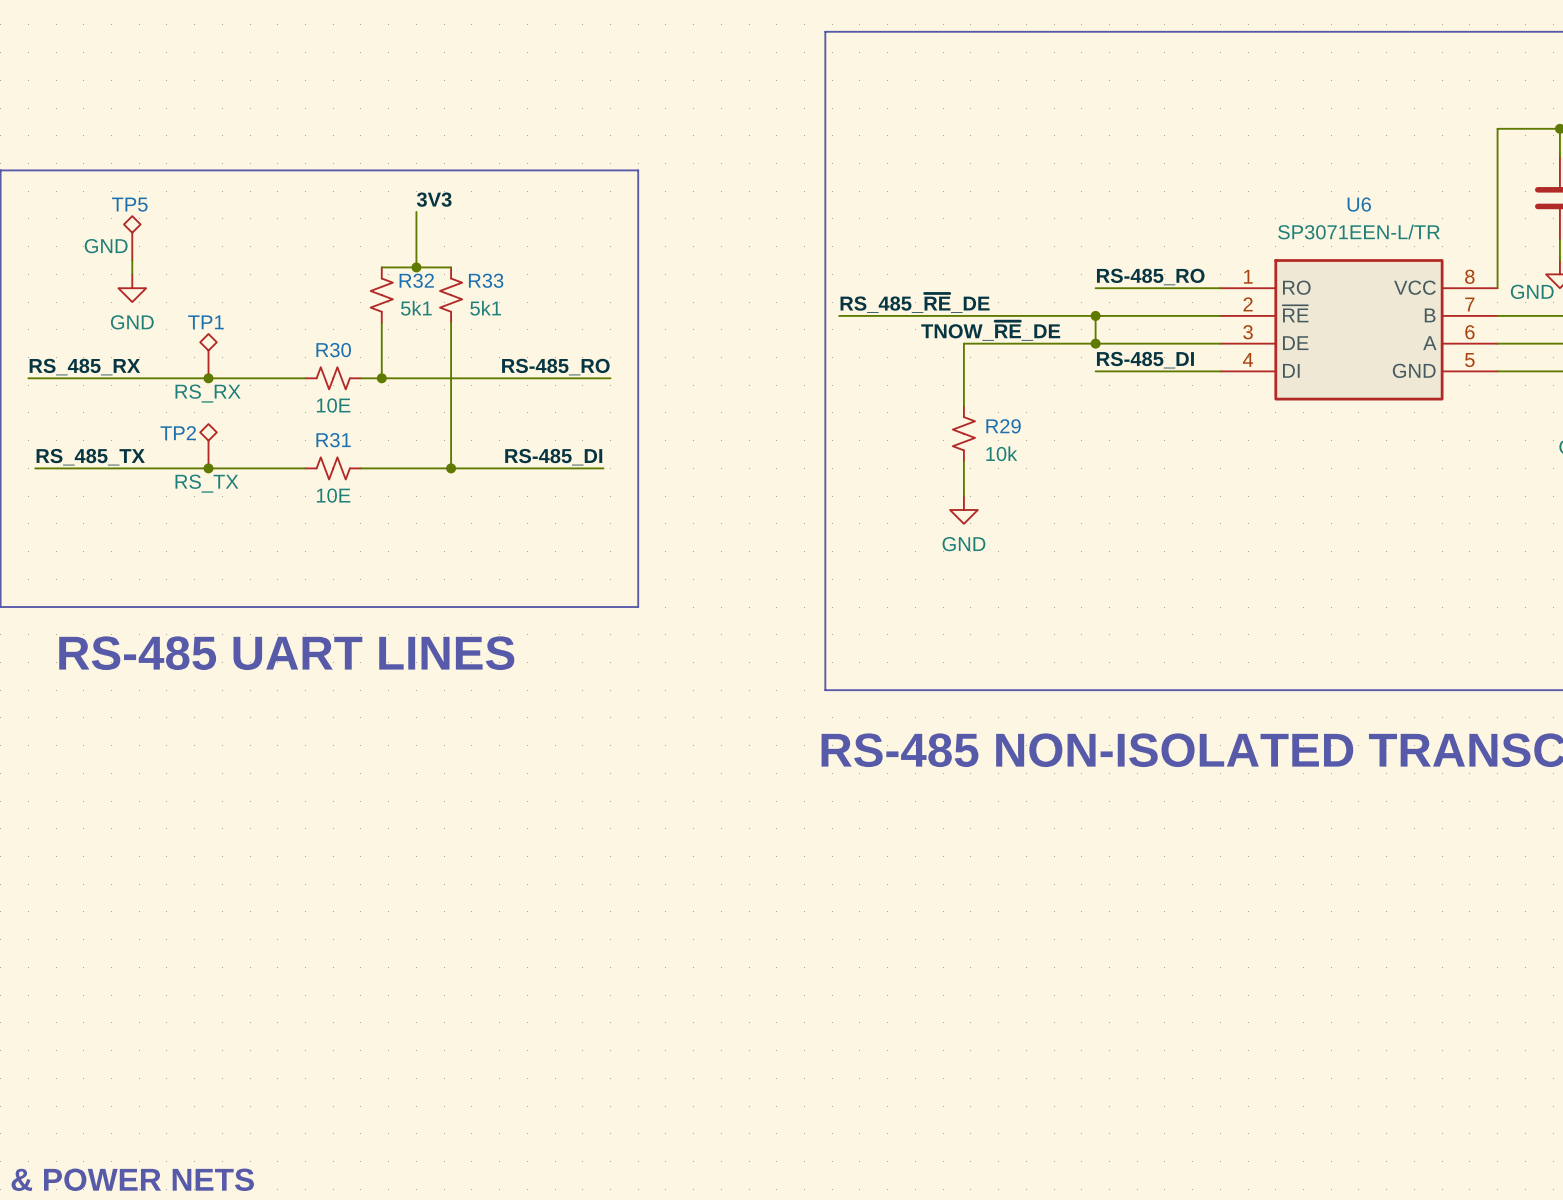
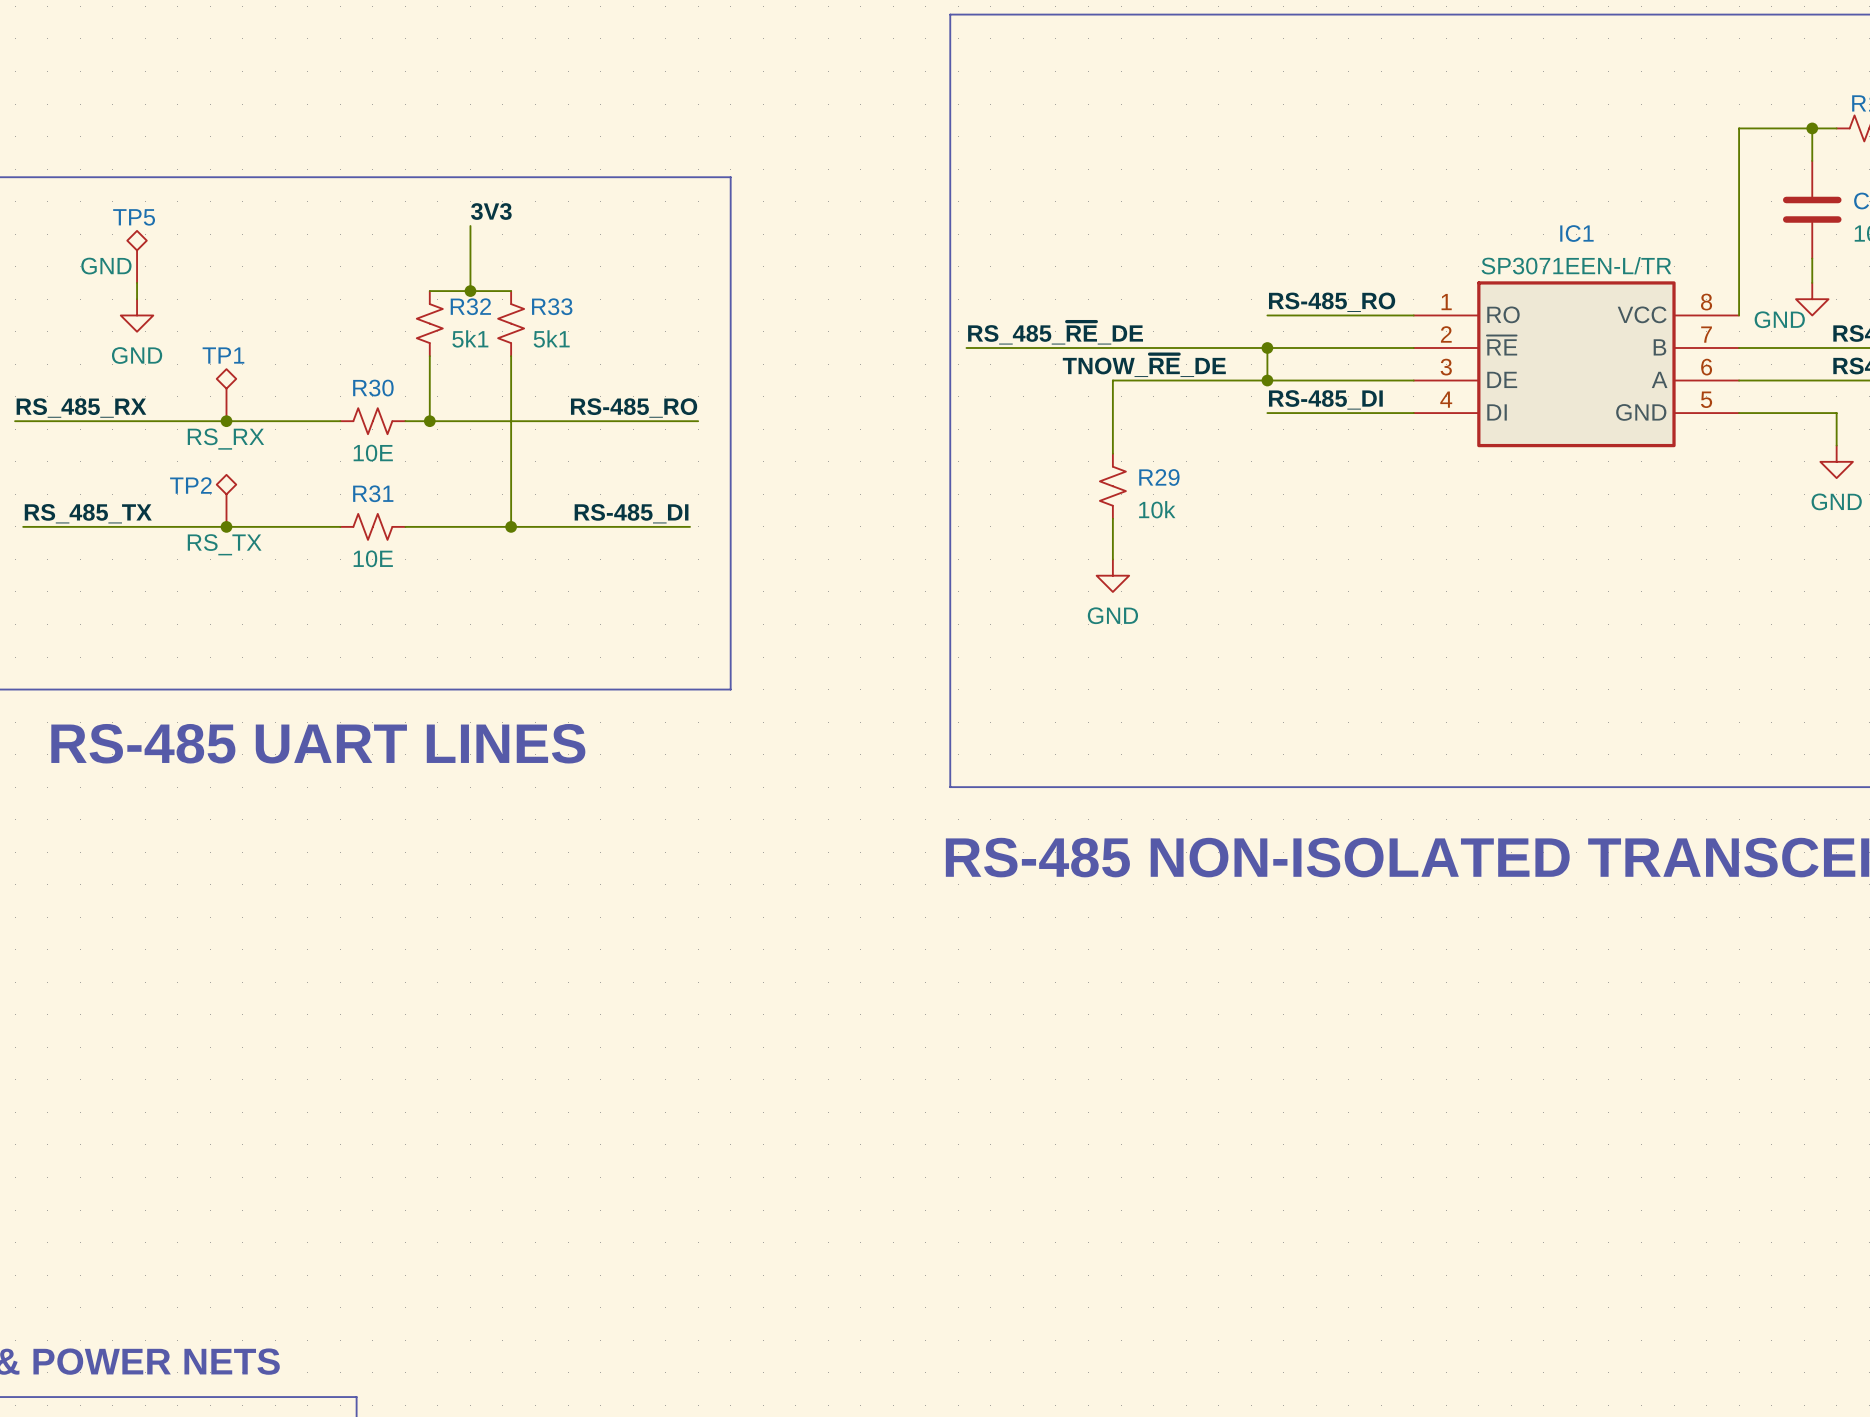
U6 name: U6 (1359, 204) -> IC1 (1576, 233)
U6 value position: SP3071EEN-L/TR (1358, 231) -> SP3071EEN-L/TR (1576, 265)

